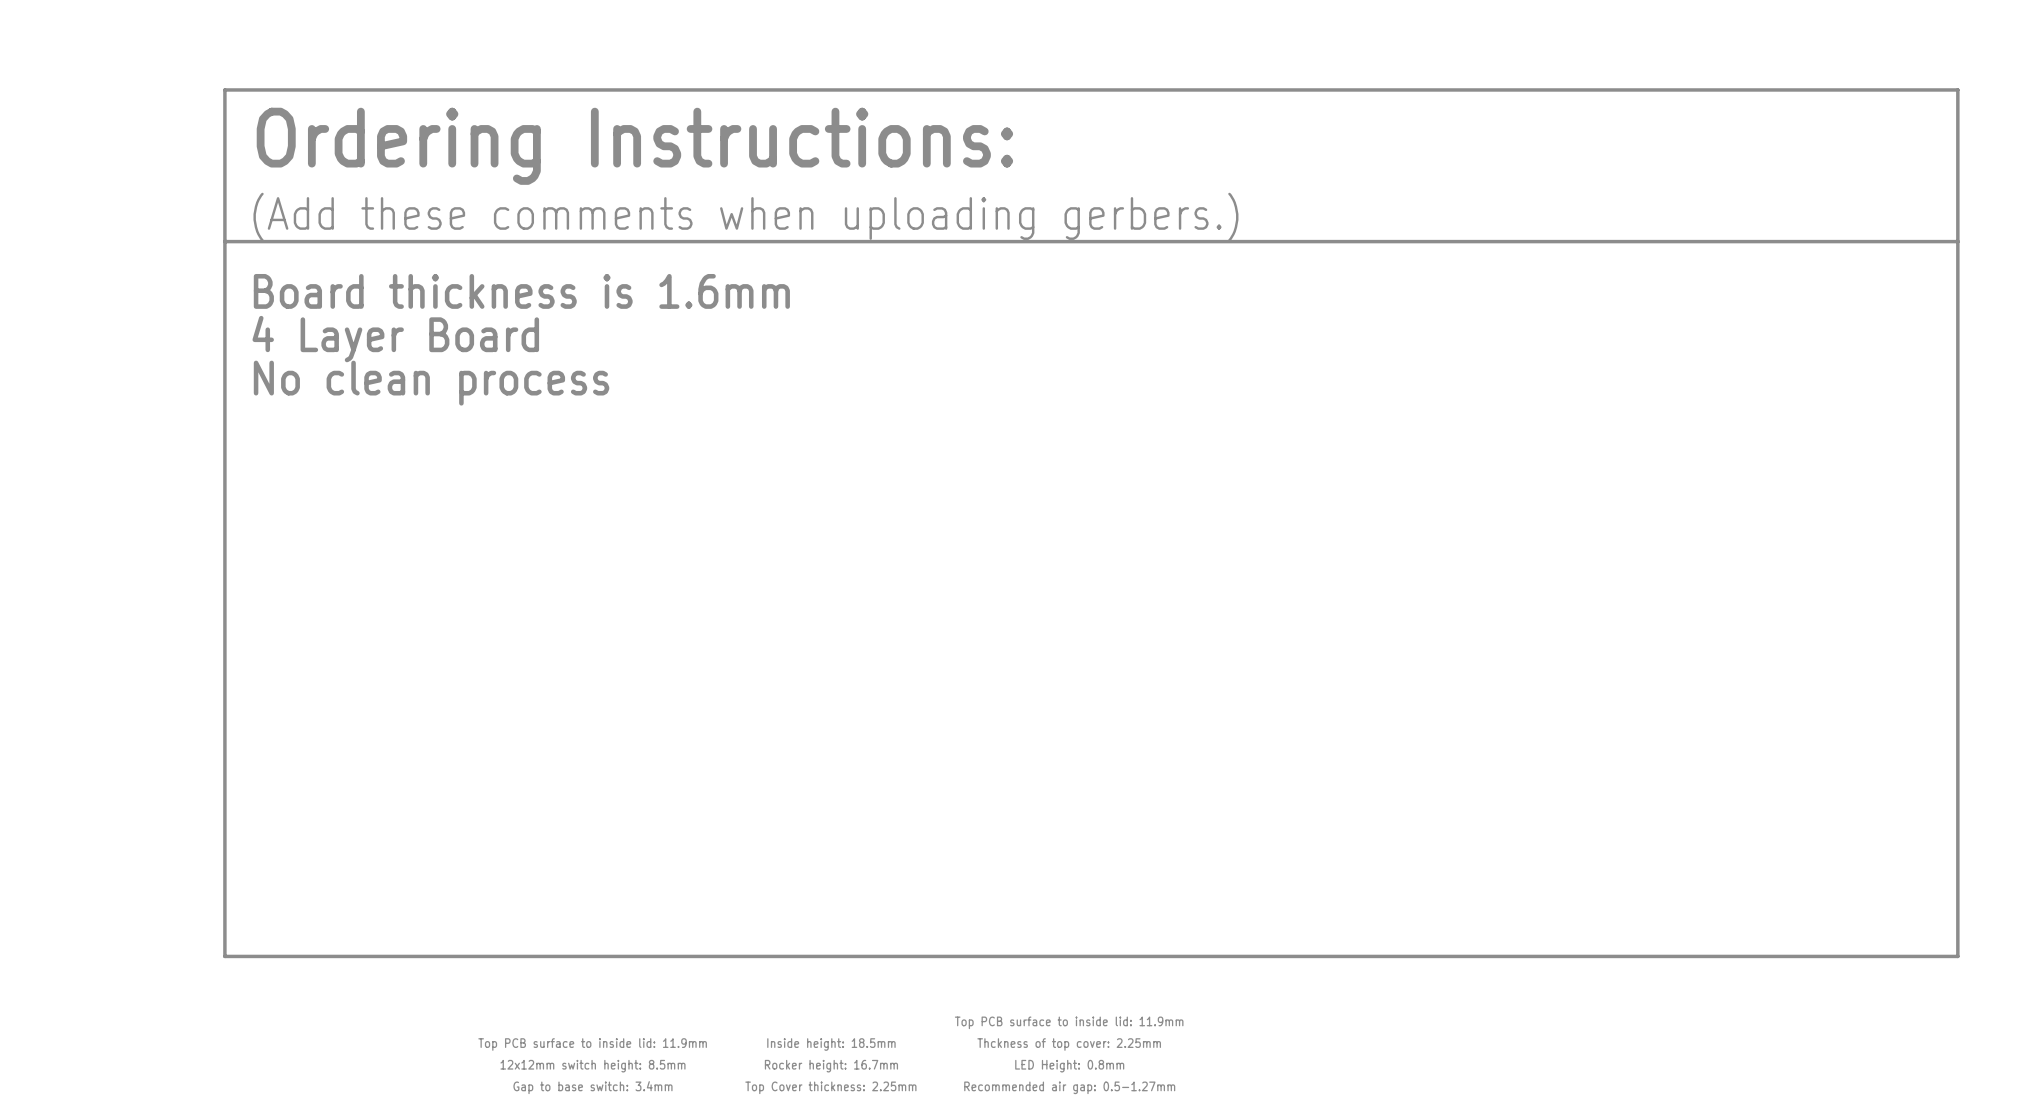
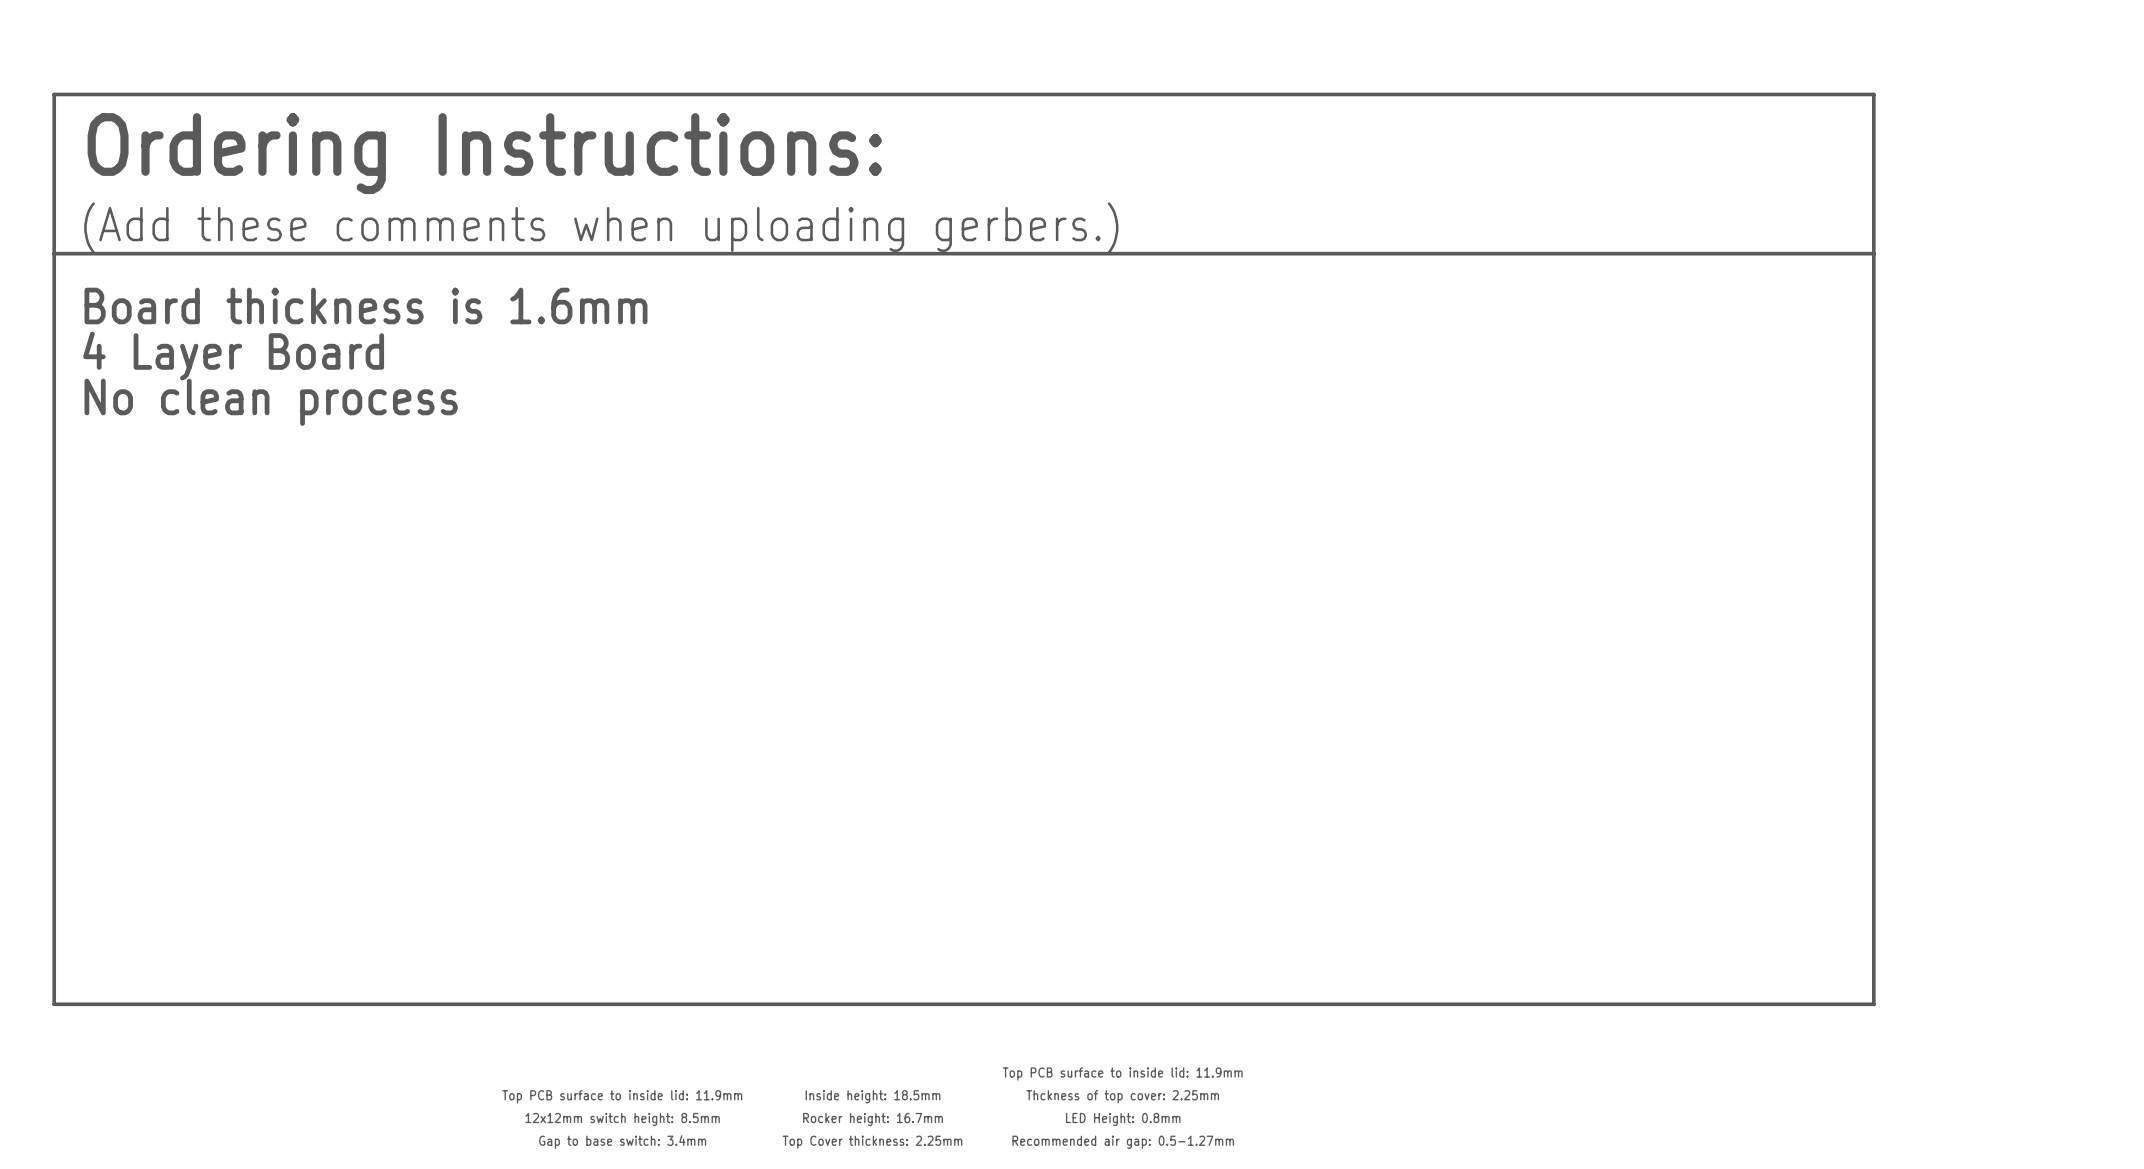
text position: Board thickness is 1.6mm (521, 291) -> Board thickness is 1.6mm (366, 306)
text position: 4 Layer Board (395, 339) -> 4 Layer Board (233, 356)
text position: No clean process (431, 383) -> No clean process (271, 402)
drawing position: (1091, 523) -> (964, 549)

